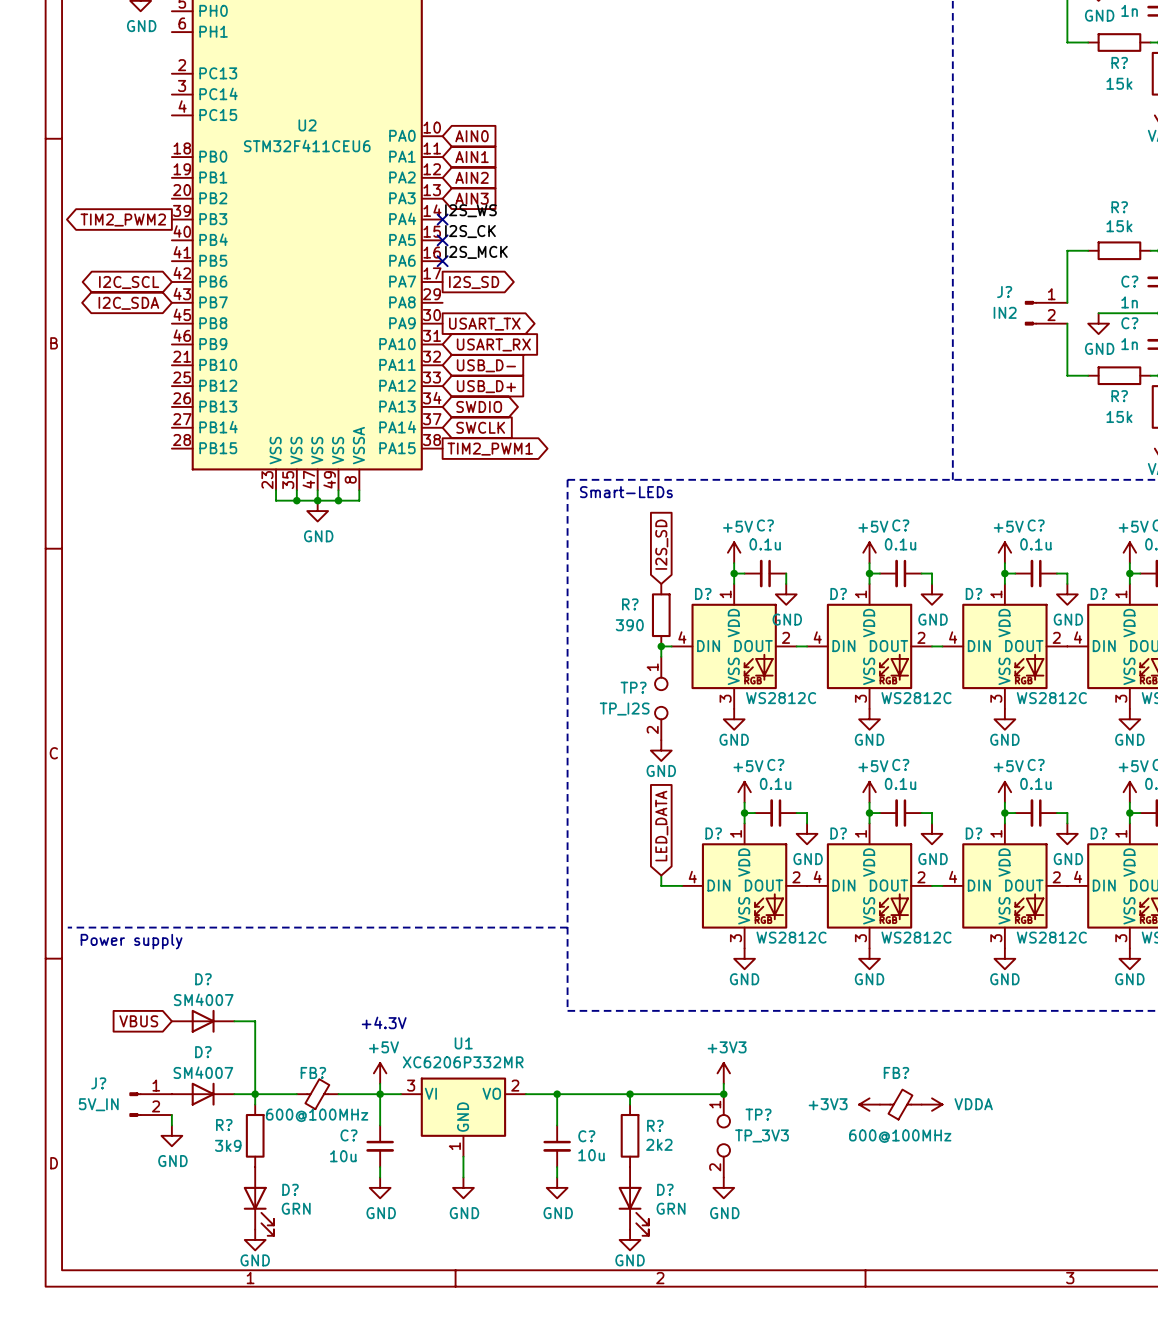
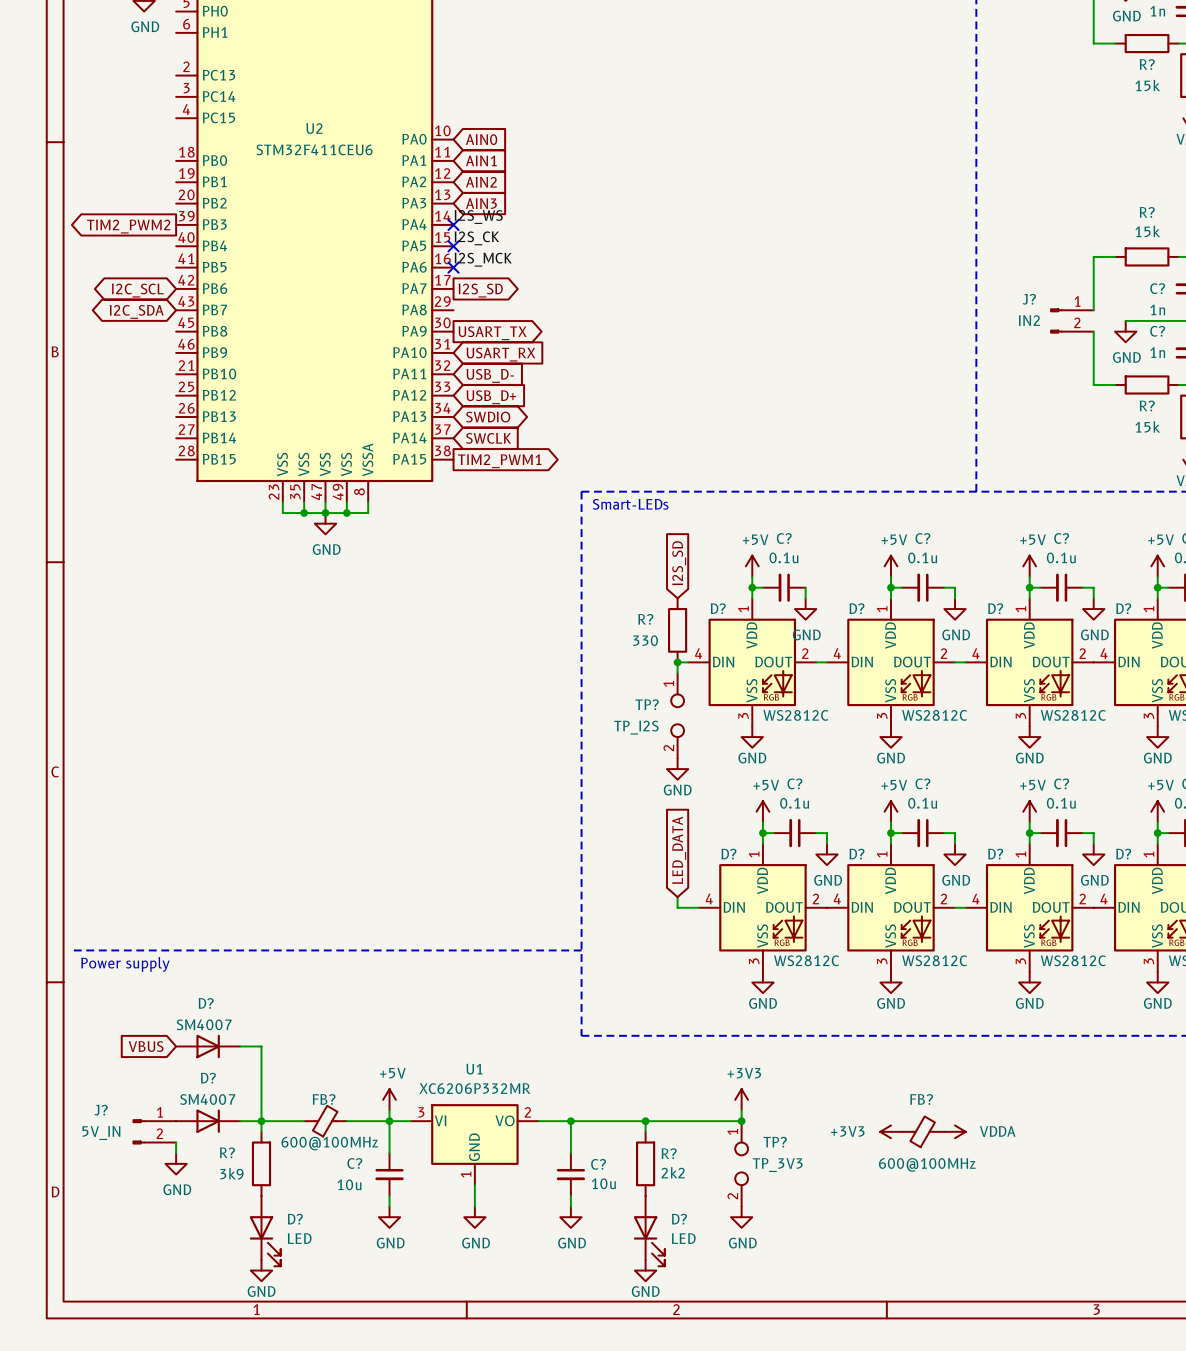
R? value: 390 (629, 625) -> 330 (645, 640)
text: +4.3V (384, 1022) -> none
D? value: GRN (296, 1208) -> LED (299, 1238)
D? value: GRN (671, 1208) -> LED (683, 1238)

